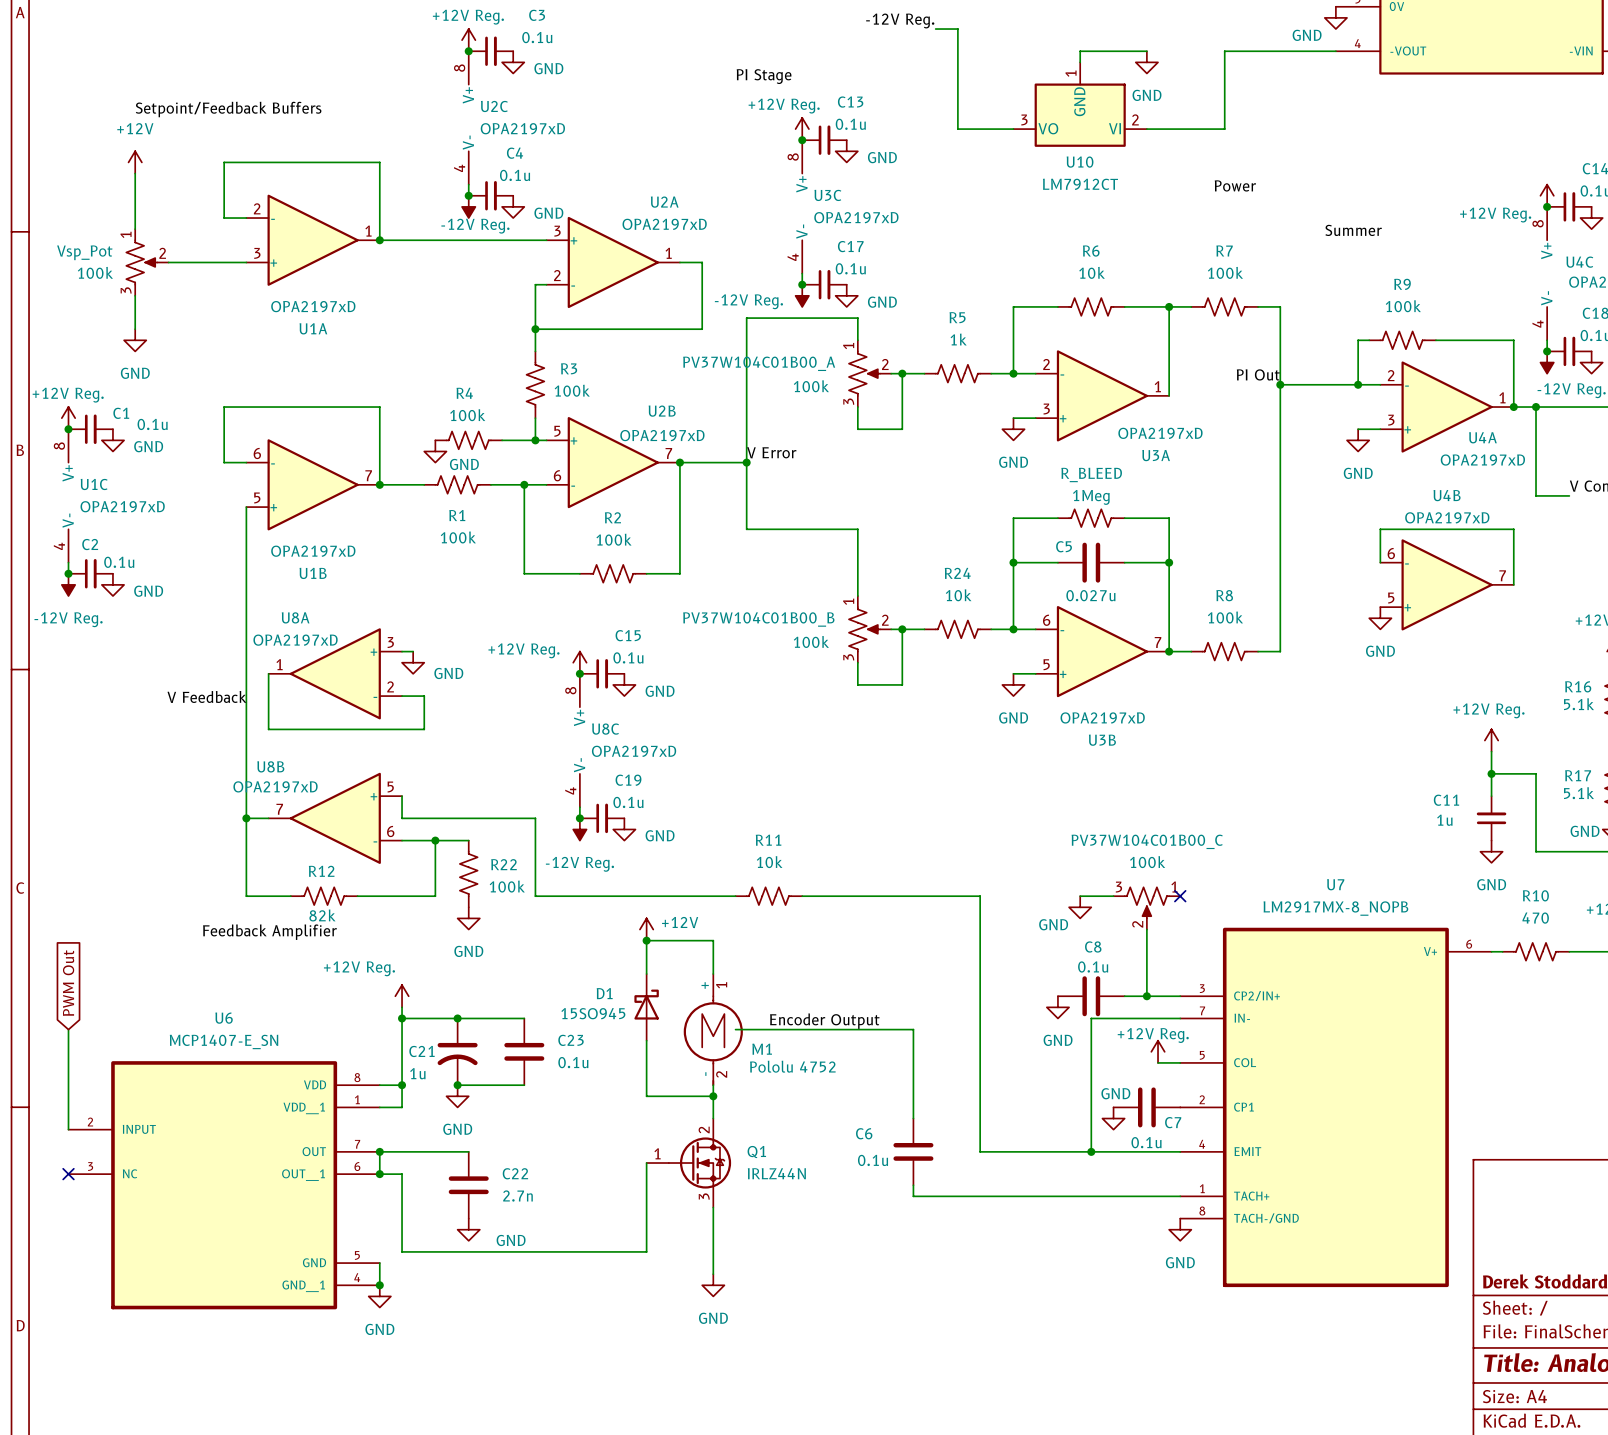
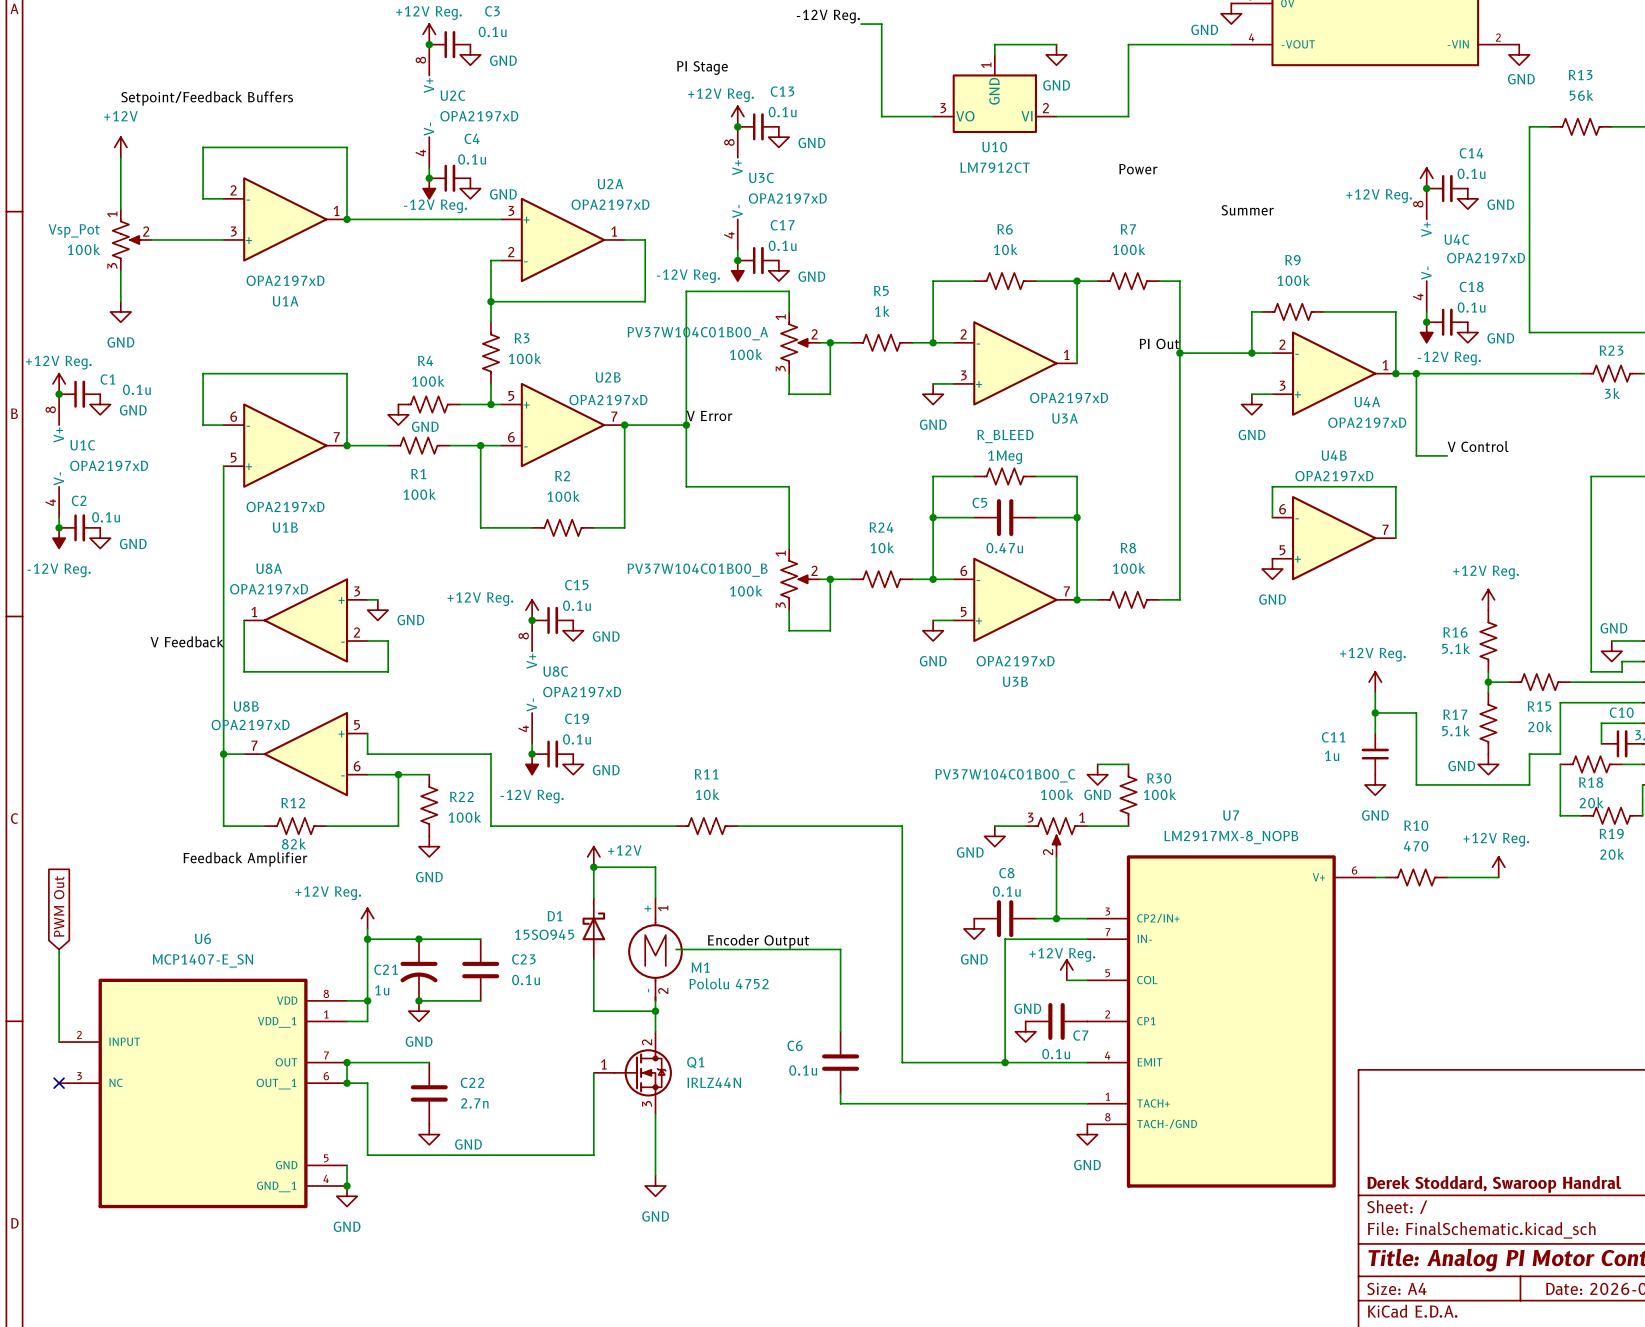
C5 value: 0.027u (1090, 595) -> 0.47u (1004, 548)
wire: none -> (1097, 764) (1128, 764)
power symbol: none -> GND (1097, 774)
PV37W104C01B00_C name position: PV37W104C01B00_C (1147, 841) -> PV37W104C01B00_C (1005, 775)
R30: none -> 100k (1128, 795)
wire: none -> (1087, 826) (1128, 826)
no-connect mark: (1180, 896) -> none

